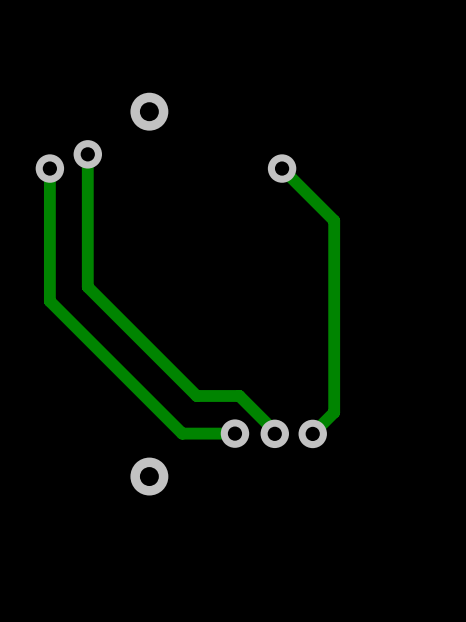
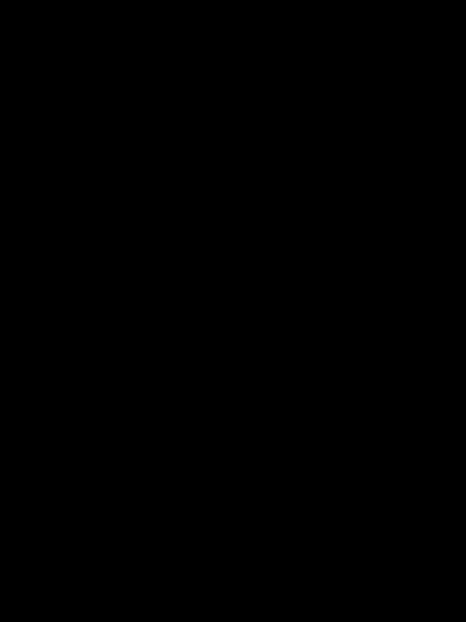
via: (149, 111) -> none
track: (87, 154) (87, 287) (196, 395) (239, 395) (274, 431) (274, 433) -> none
via: (87, 154) -> none
track: (49, 168) (49, 301) (182, 433) (234, 433) -> none
via: (49, 168) -> none
track: (282, 168) (334, 220) (334, 412) (312, 433) -> none
via: (282, 168) -> none
via: (234, 433) -> none
via: (274, 433) -> none
via: (312, 433) -> none
via: (149, 476) -> none

